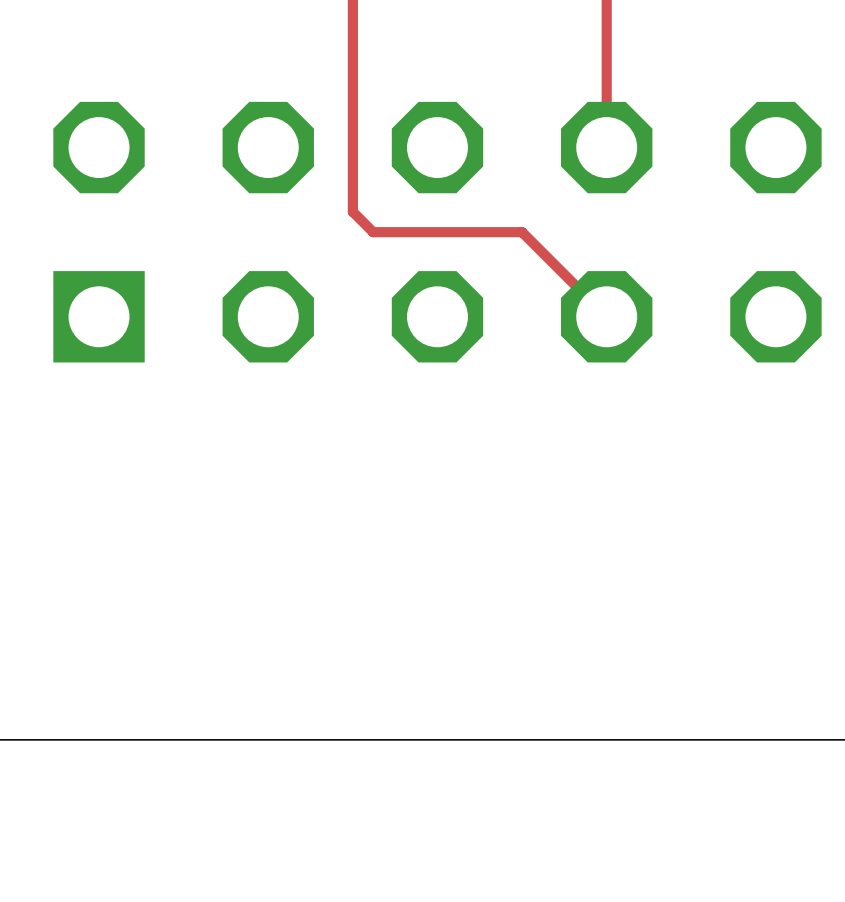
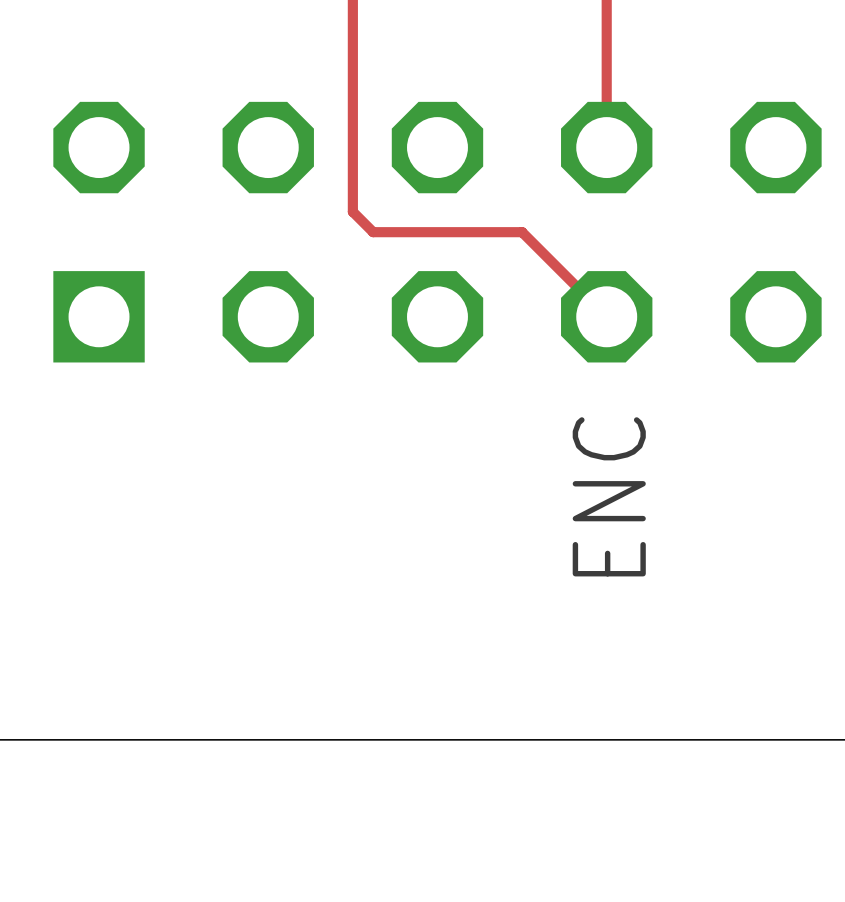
text: none -> ENC (609, 496)

